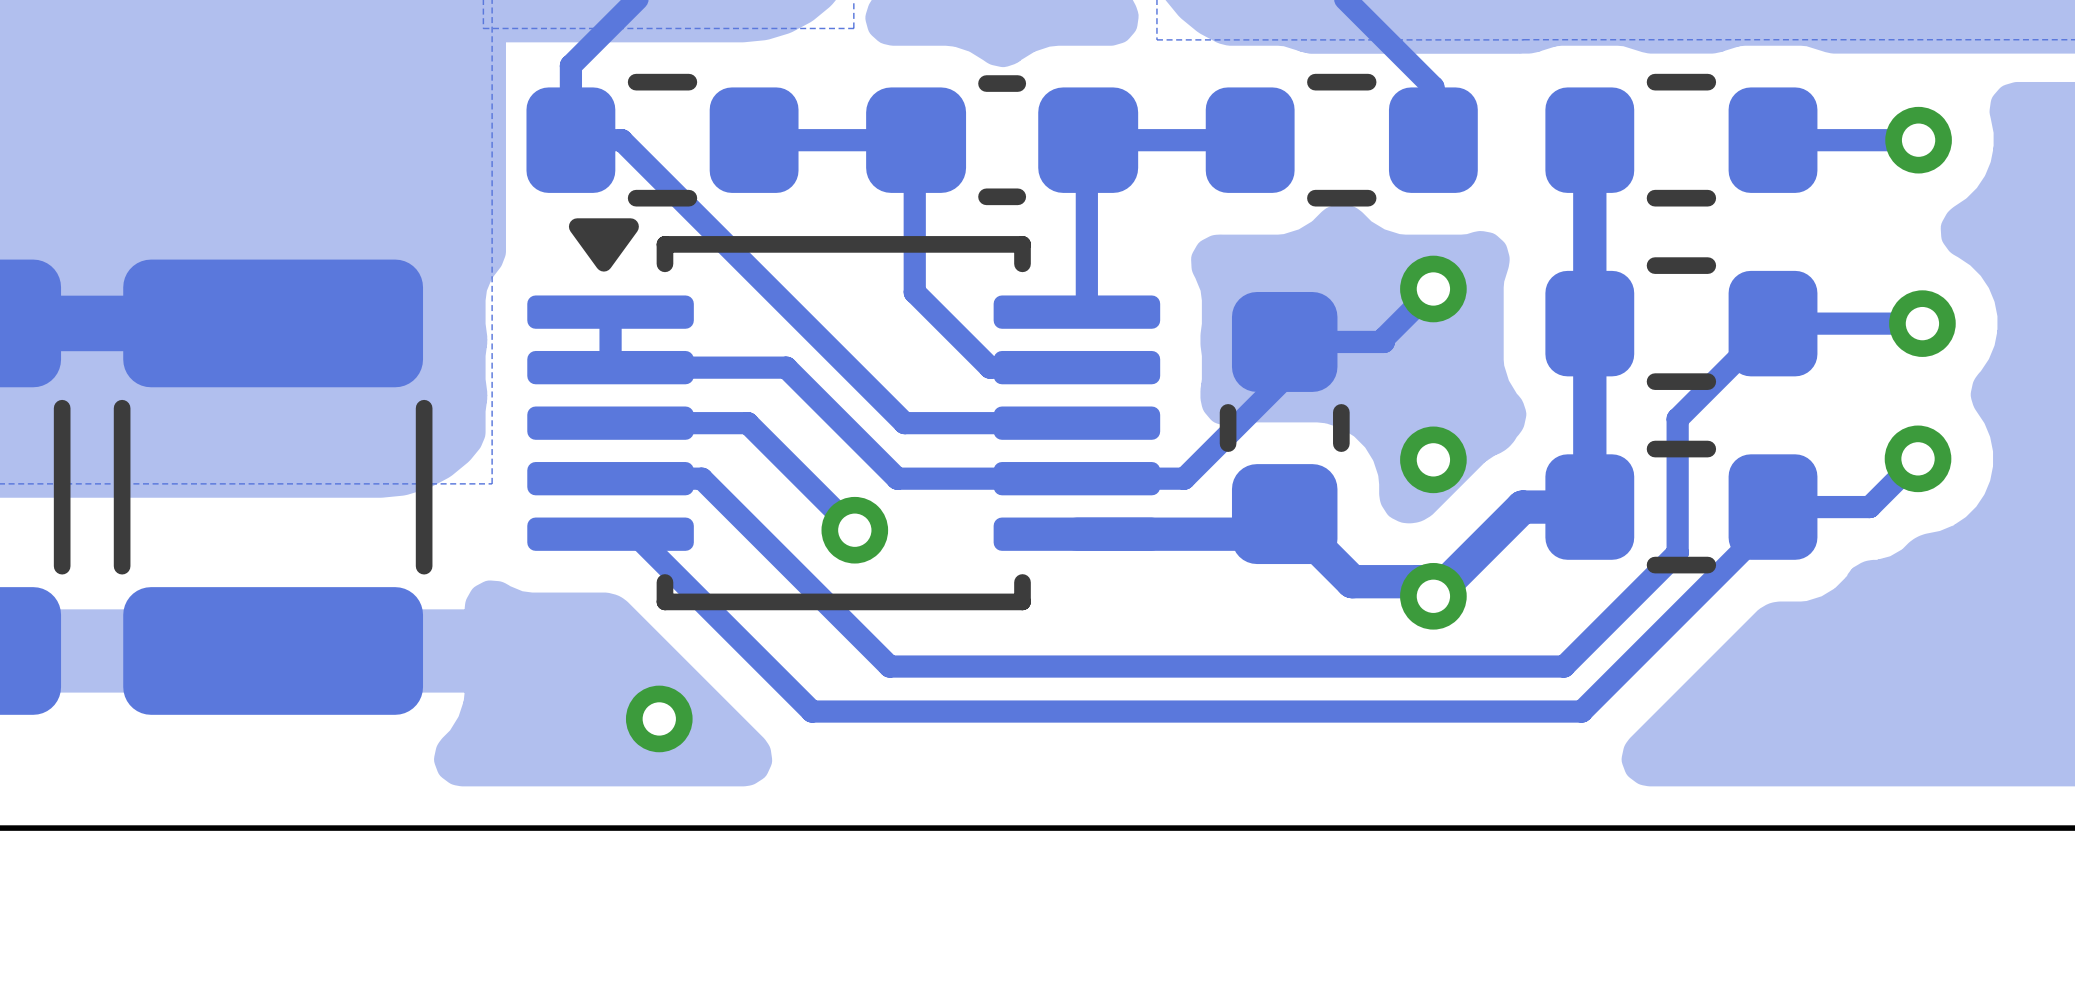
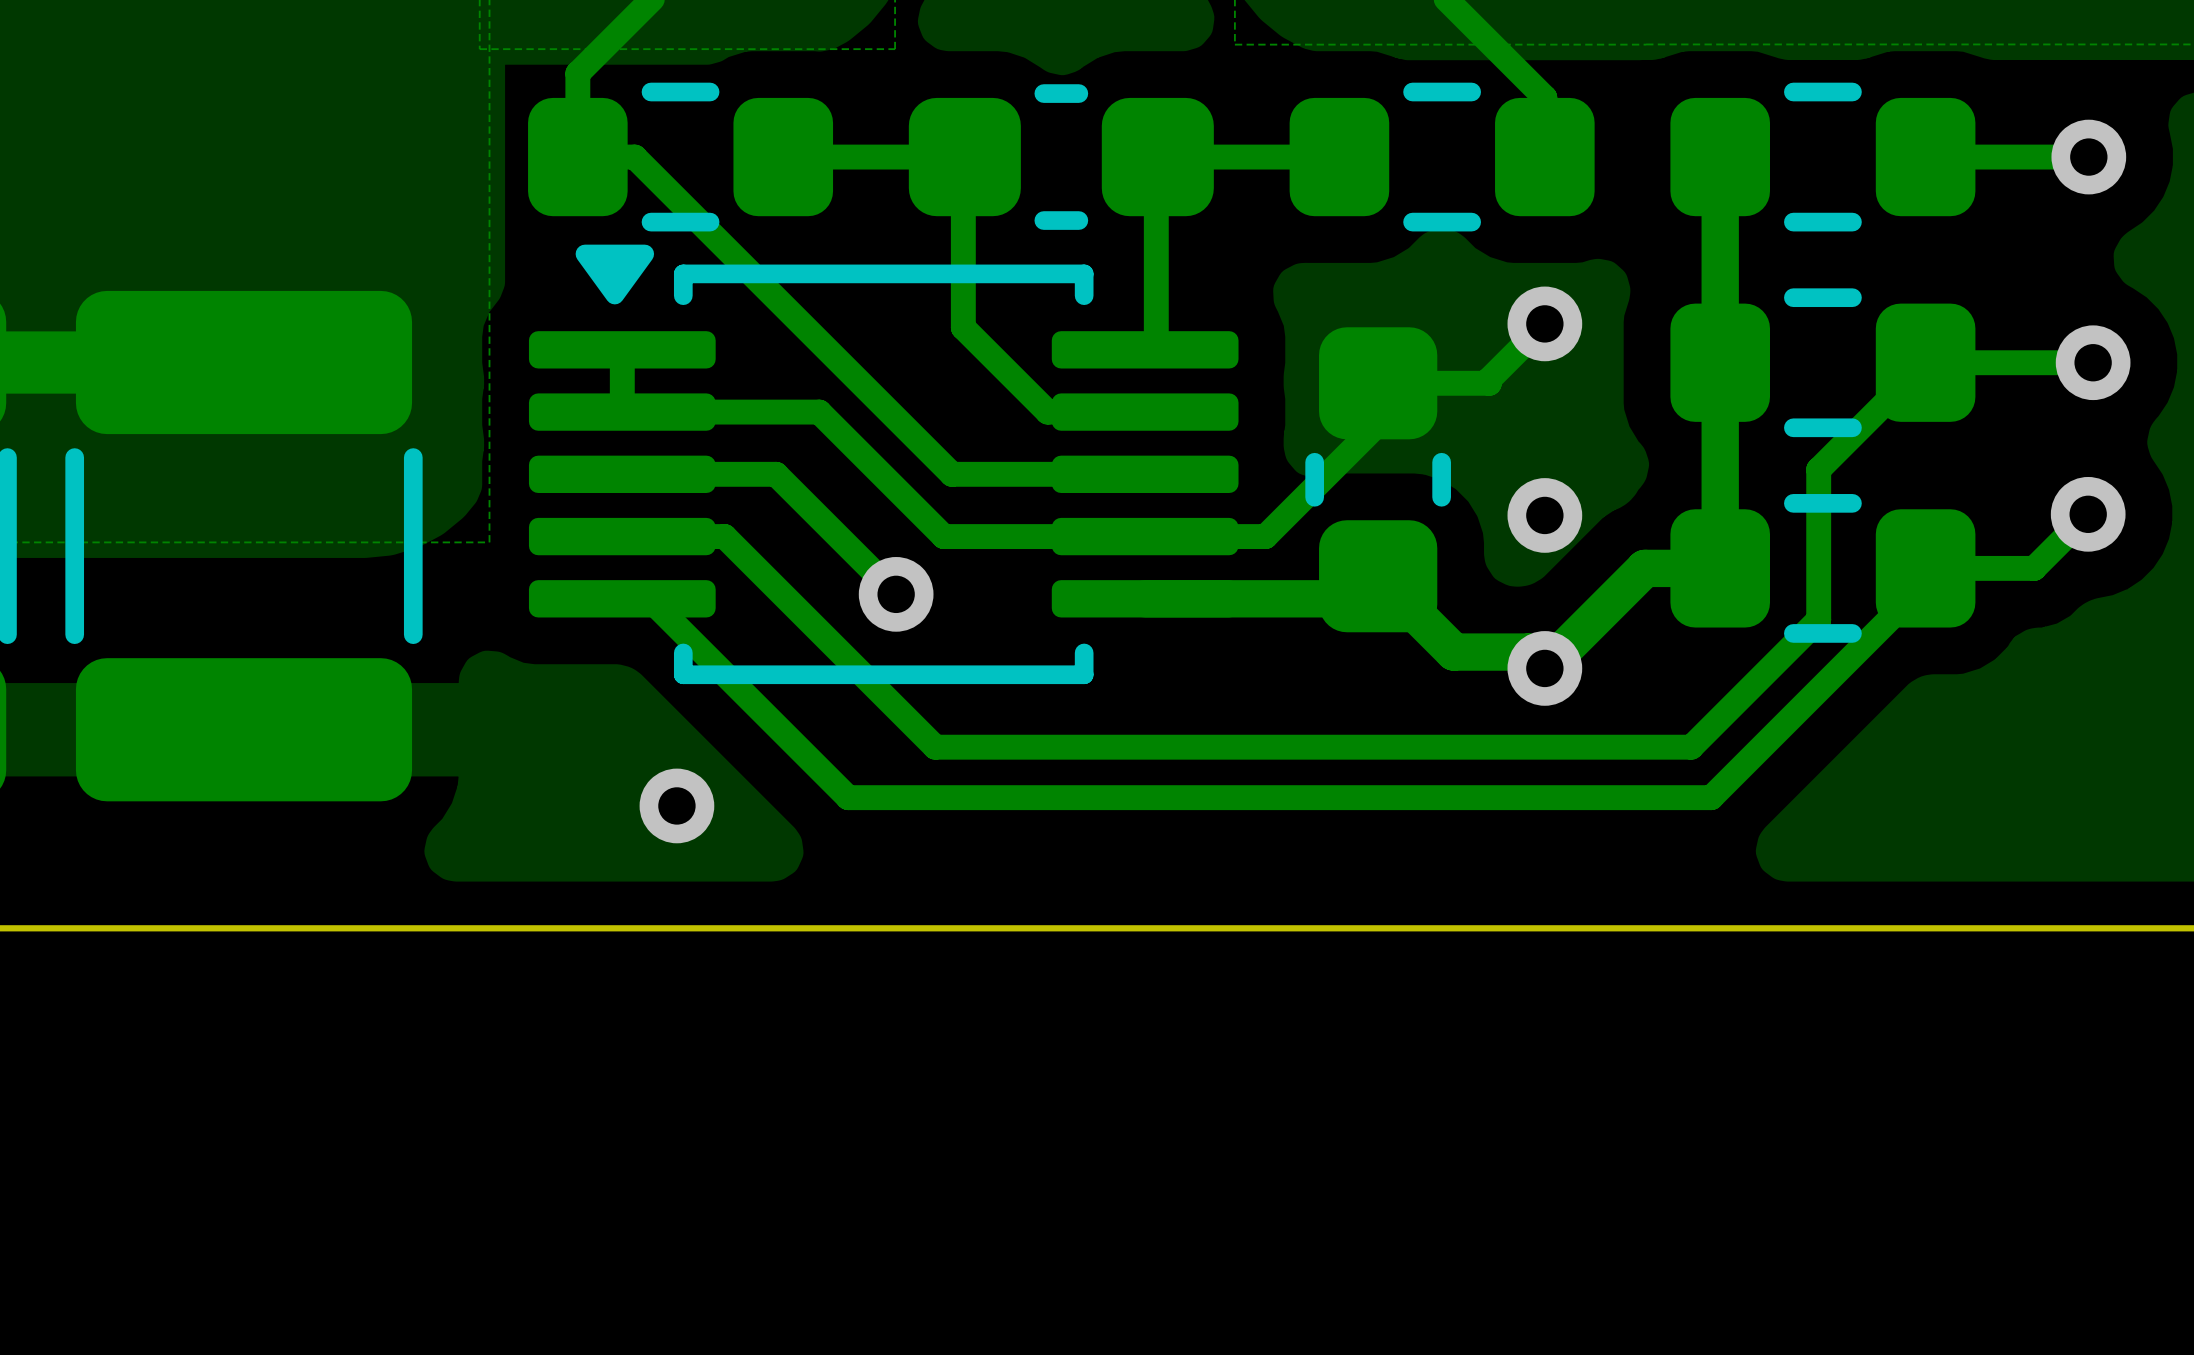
zone outline: (853, 28) (483, 28) -> (895, 31) (895, 49) (479, 49) (479, 31)

